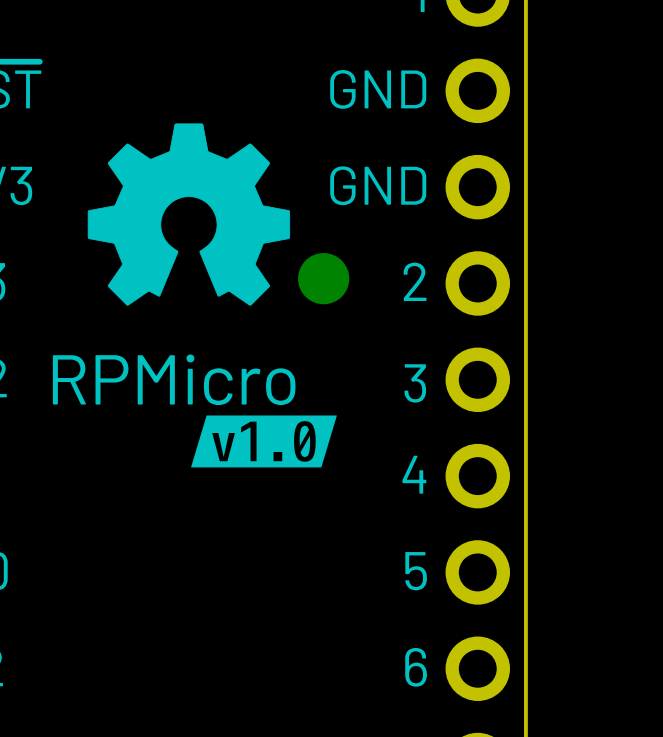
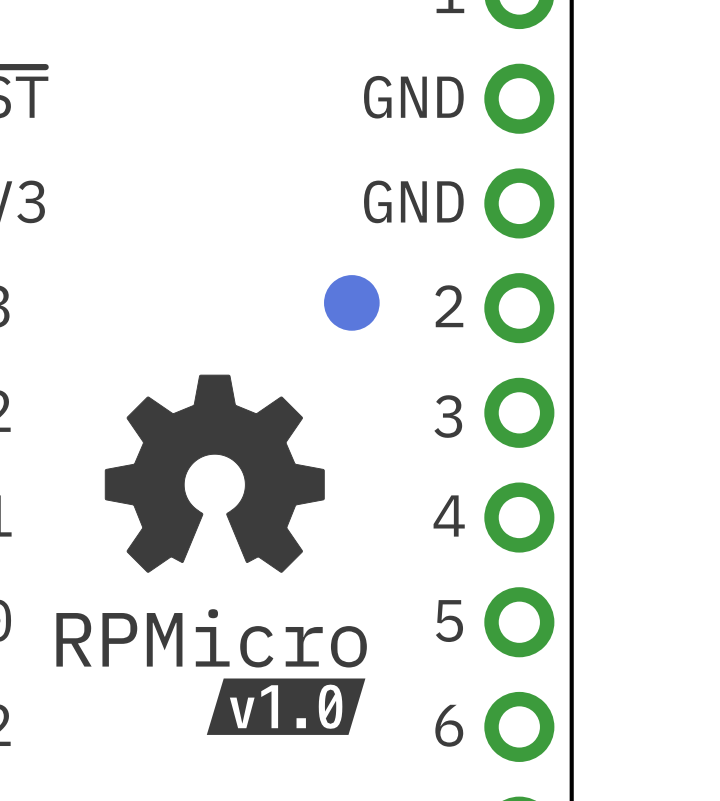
drawing: [87, 123, 291, 306] -> none
drawing: none -> [104, 374, 325, 573]
text position: RPMicro (174, 379) -> RPMicro (211, 638)
drawing position: (263, 441) -> (286, 706)

